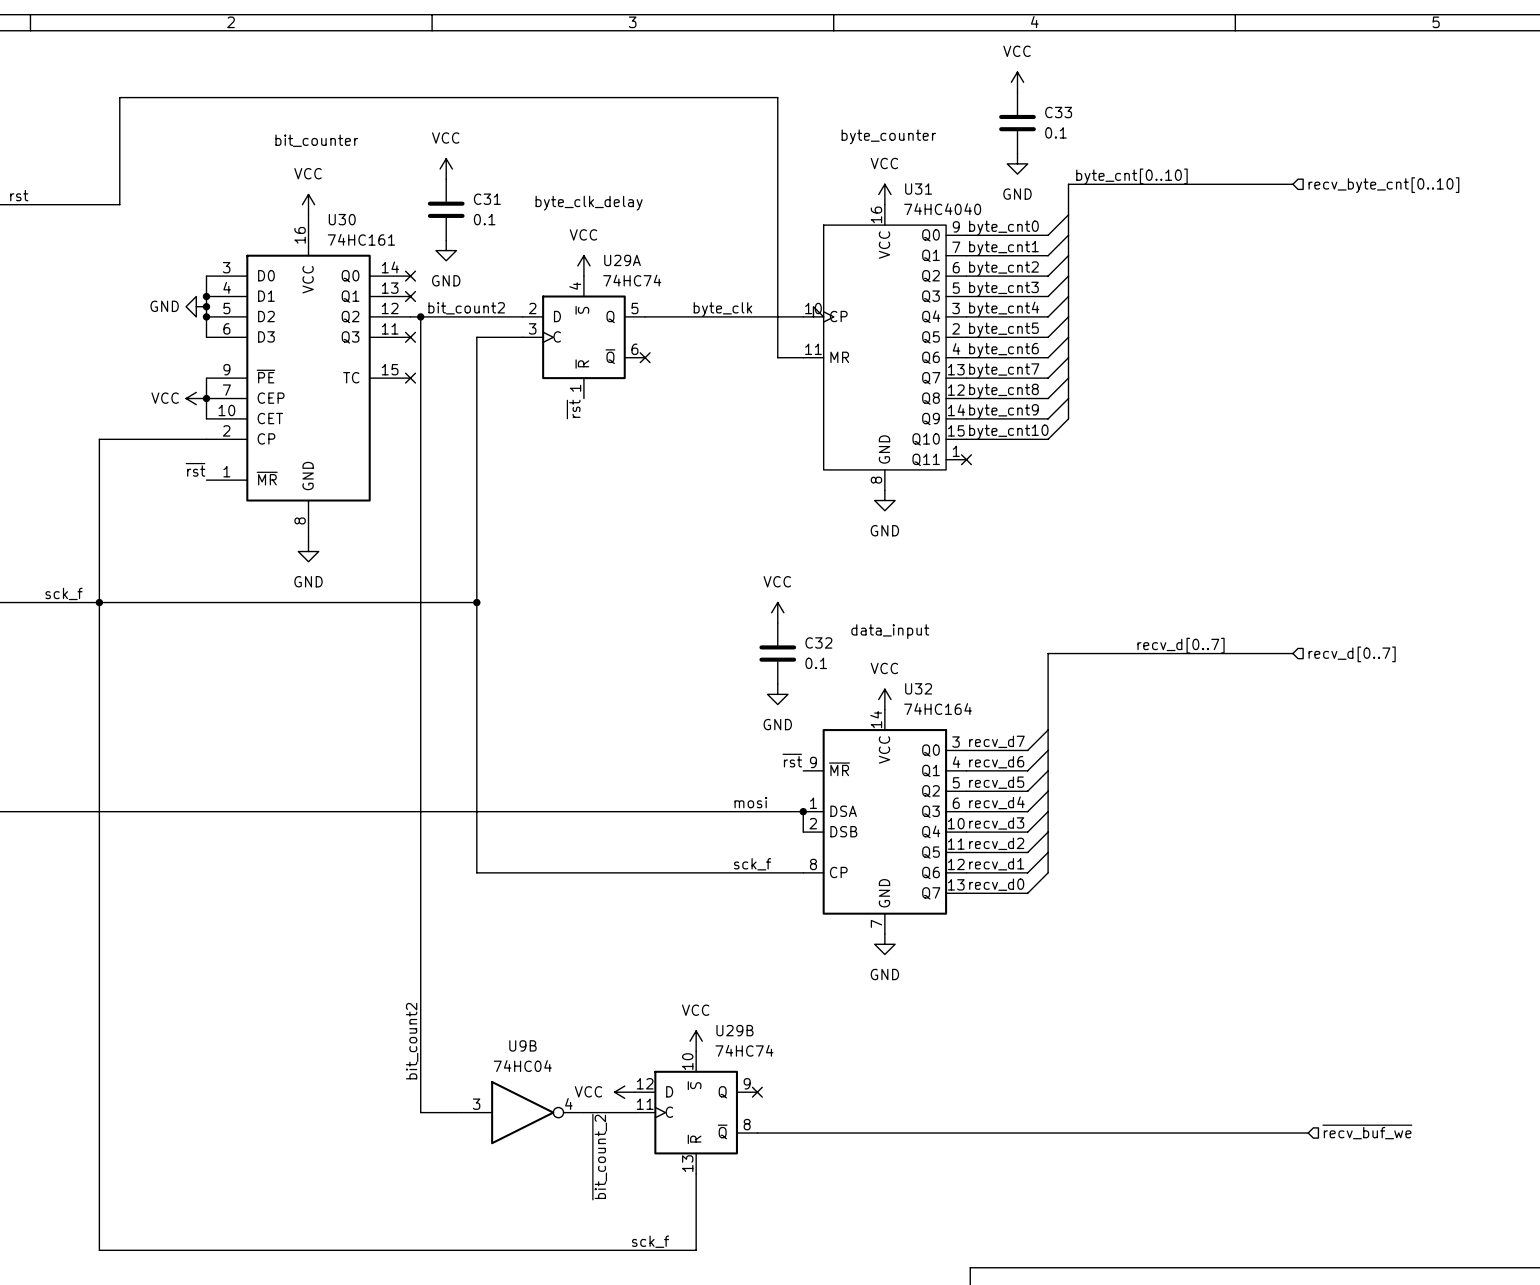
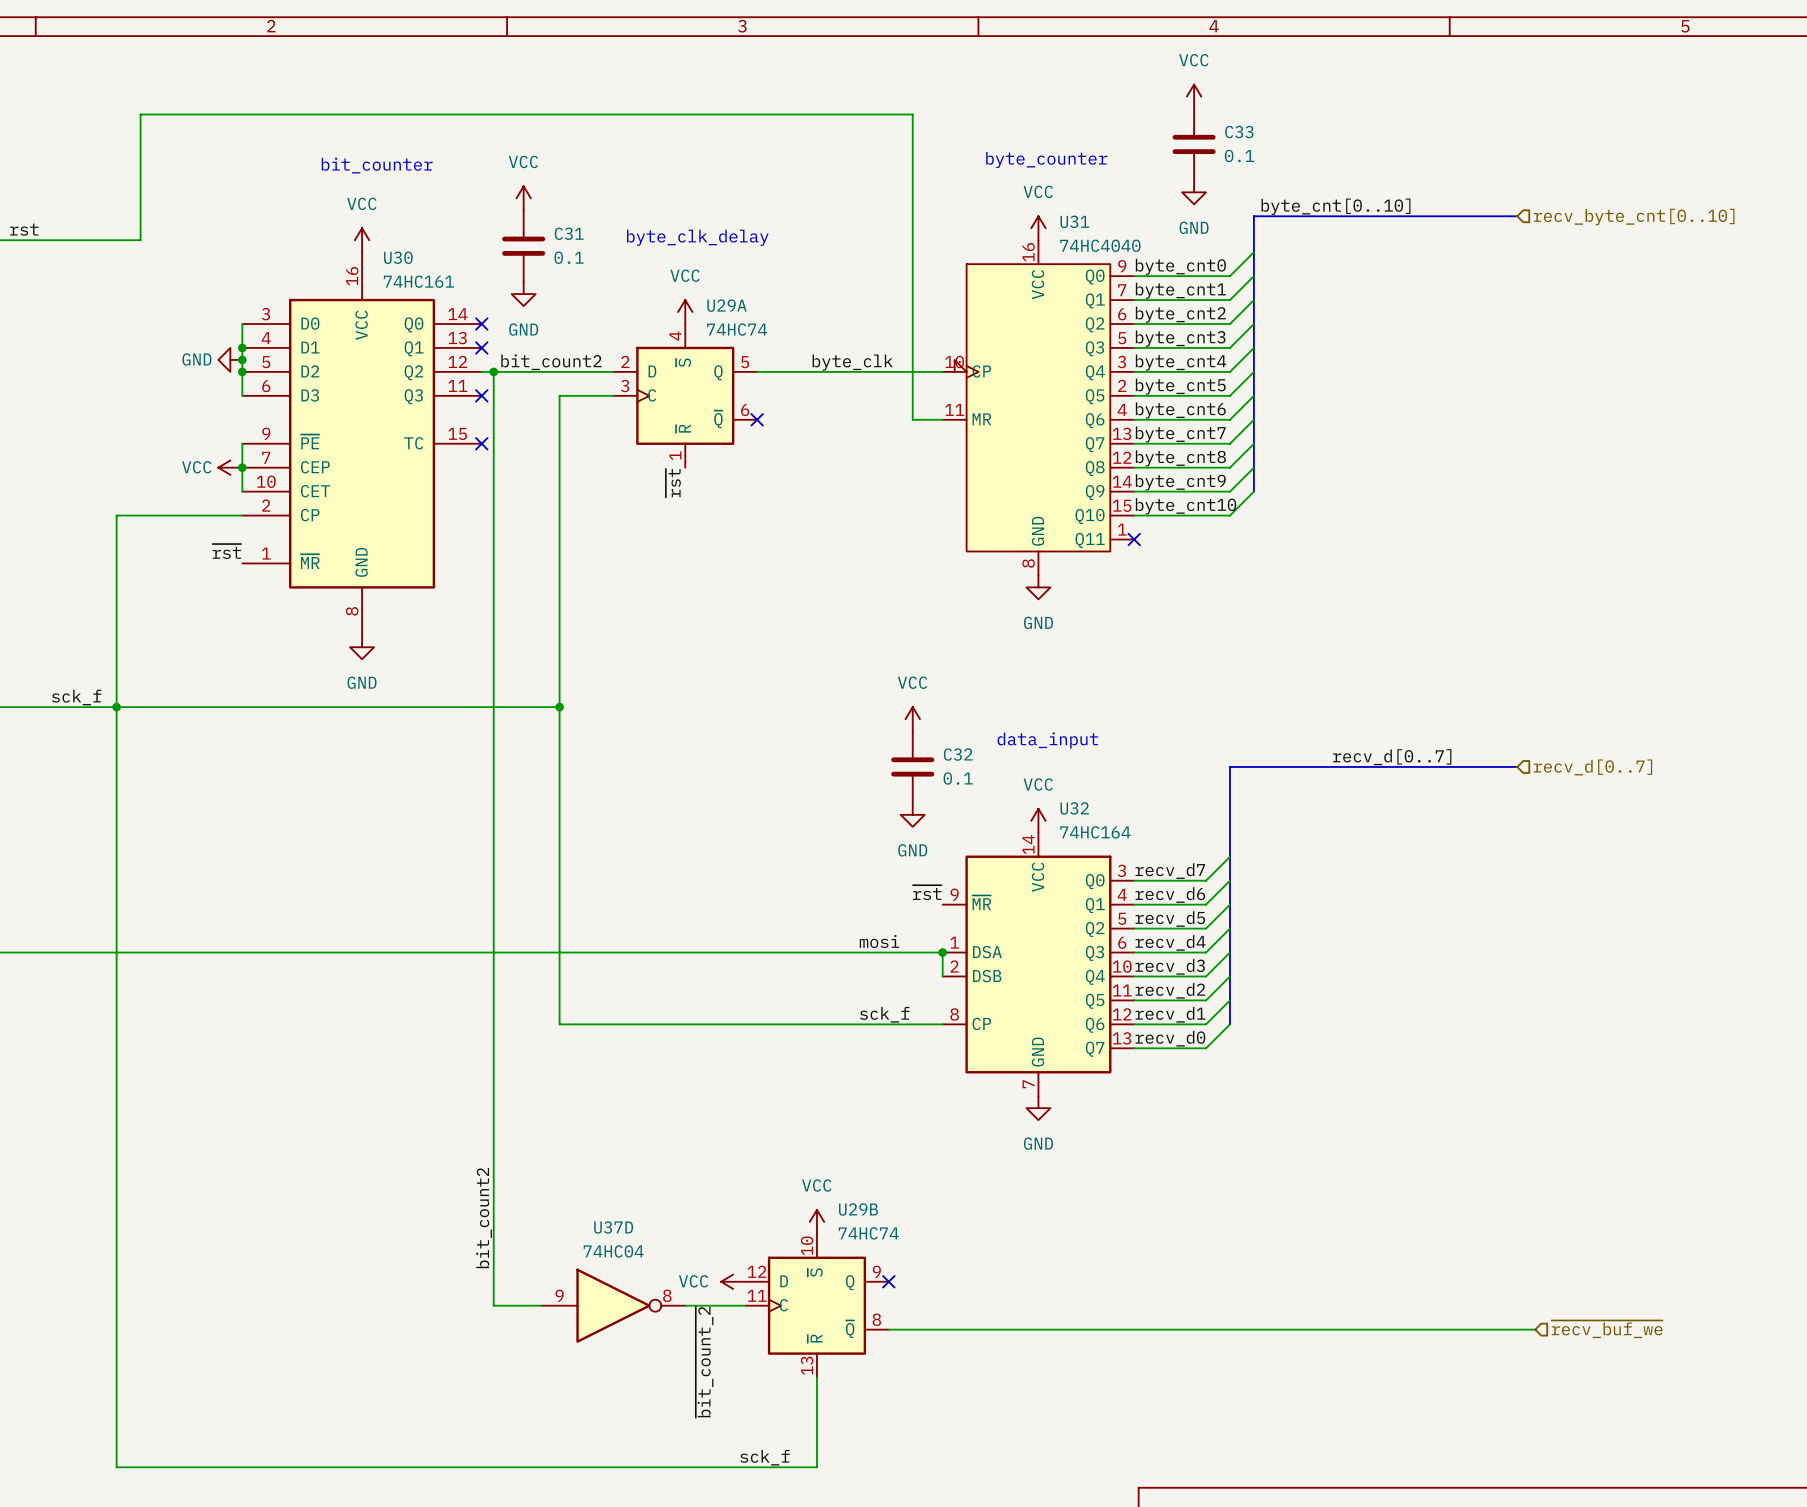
U9B name: U9B (522, 1045) -> U37D (613, 1227)
U9B pin number: 4 (568, 1103) -> 8 (667, 1295)
U9B pin number: 3 (476, 1104) -> 9 (559, 1295)

